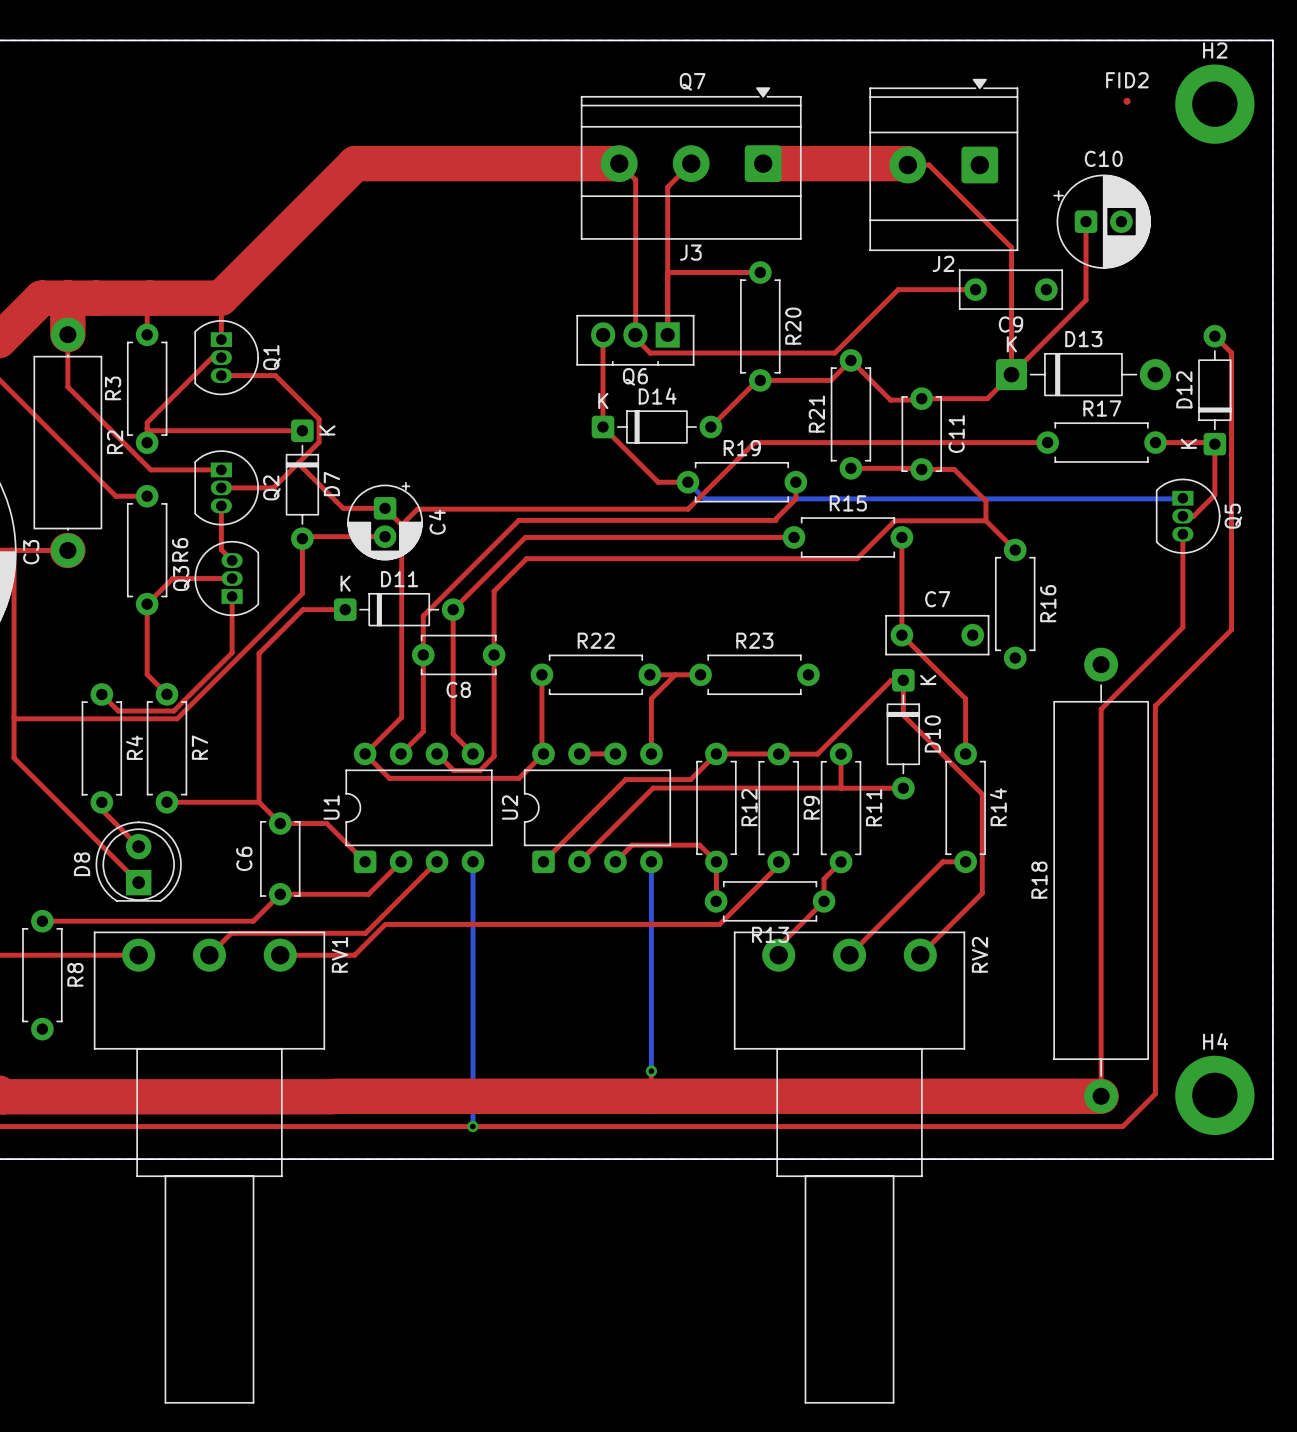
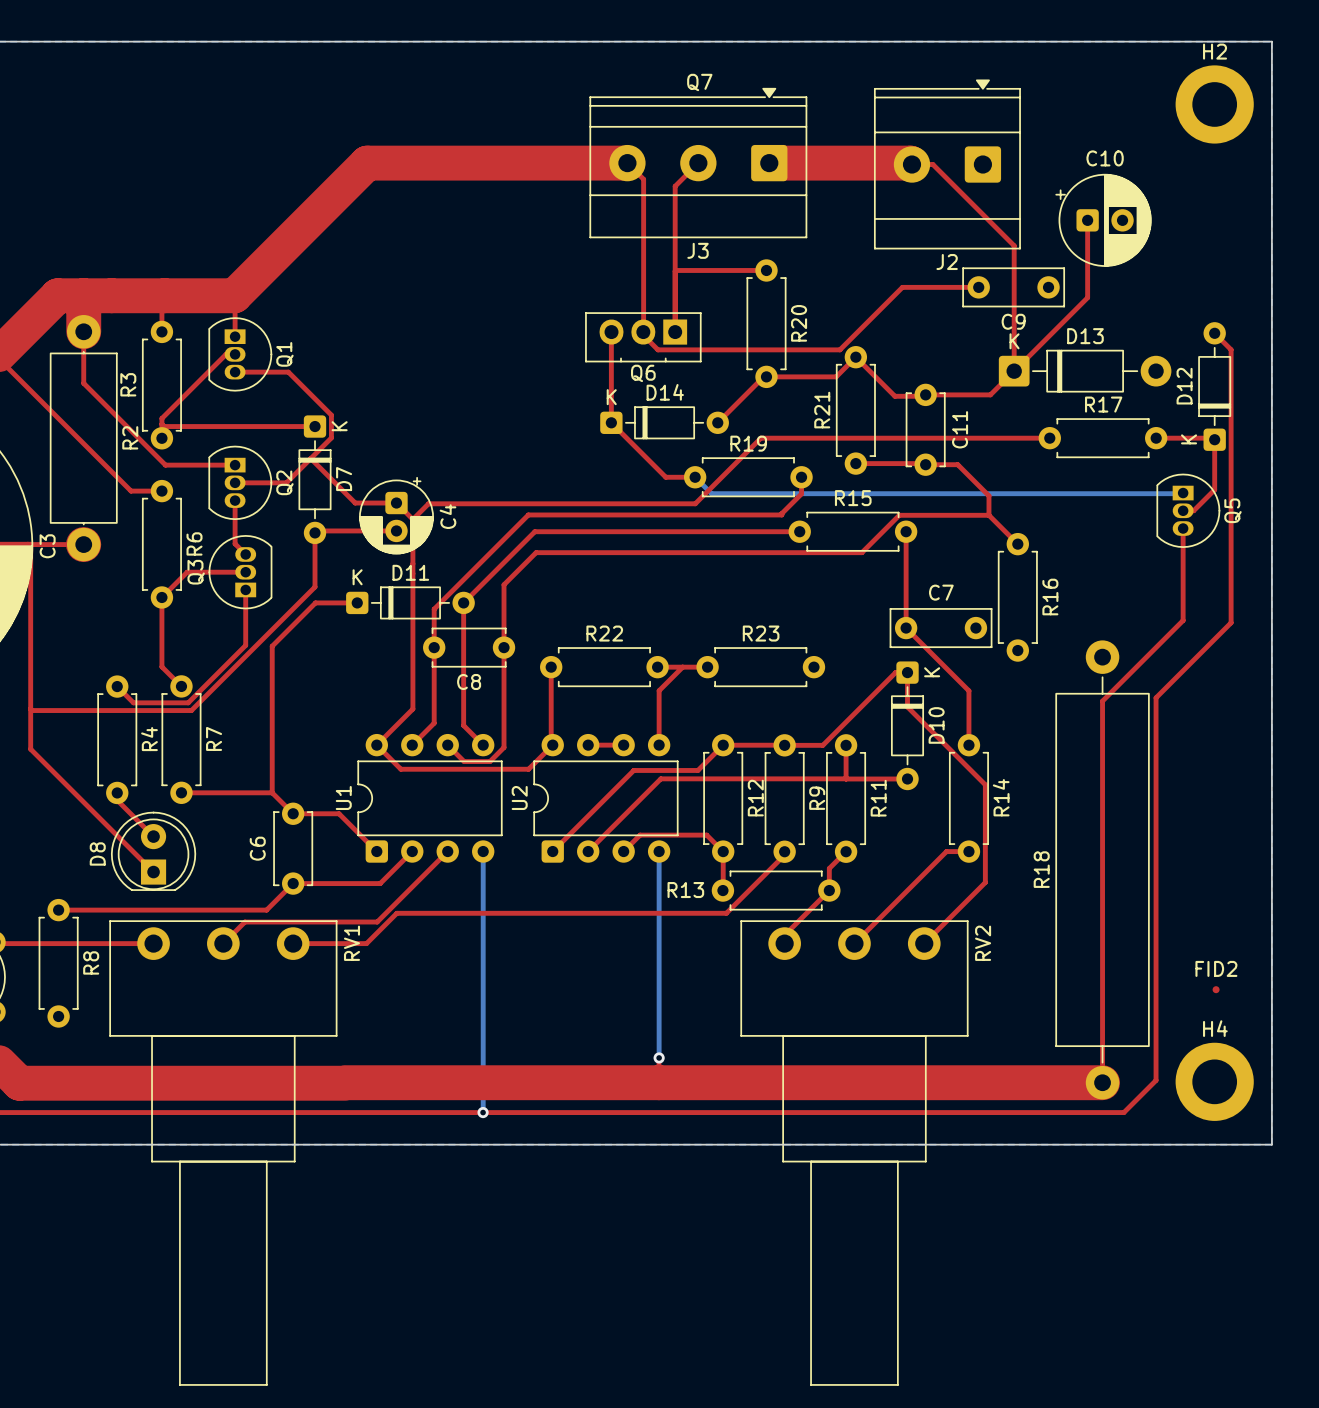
FID2 position: (1127, 101) -> (1216, 989)
R13 name position: R13 (770, 934) -> R13 (685, 890)

